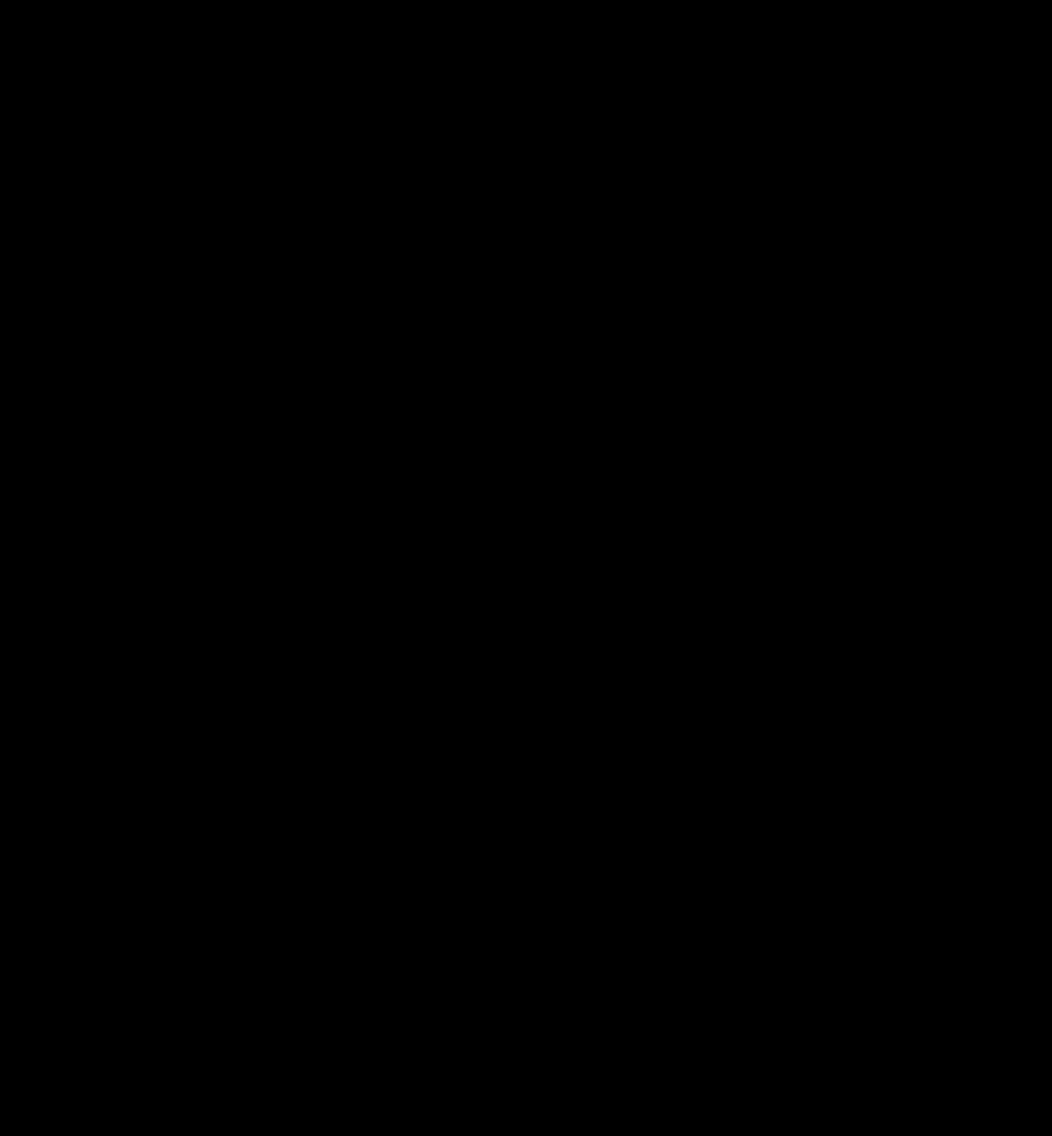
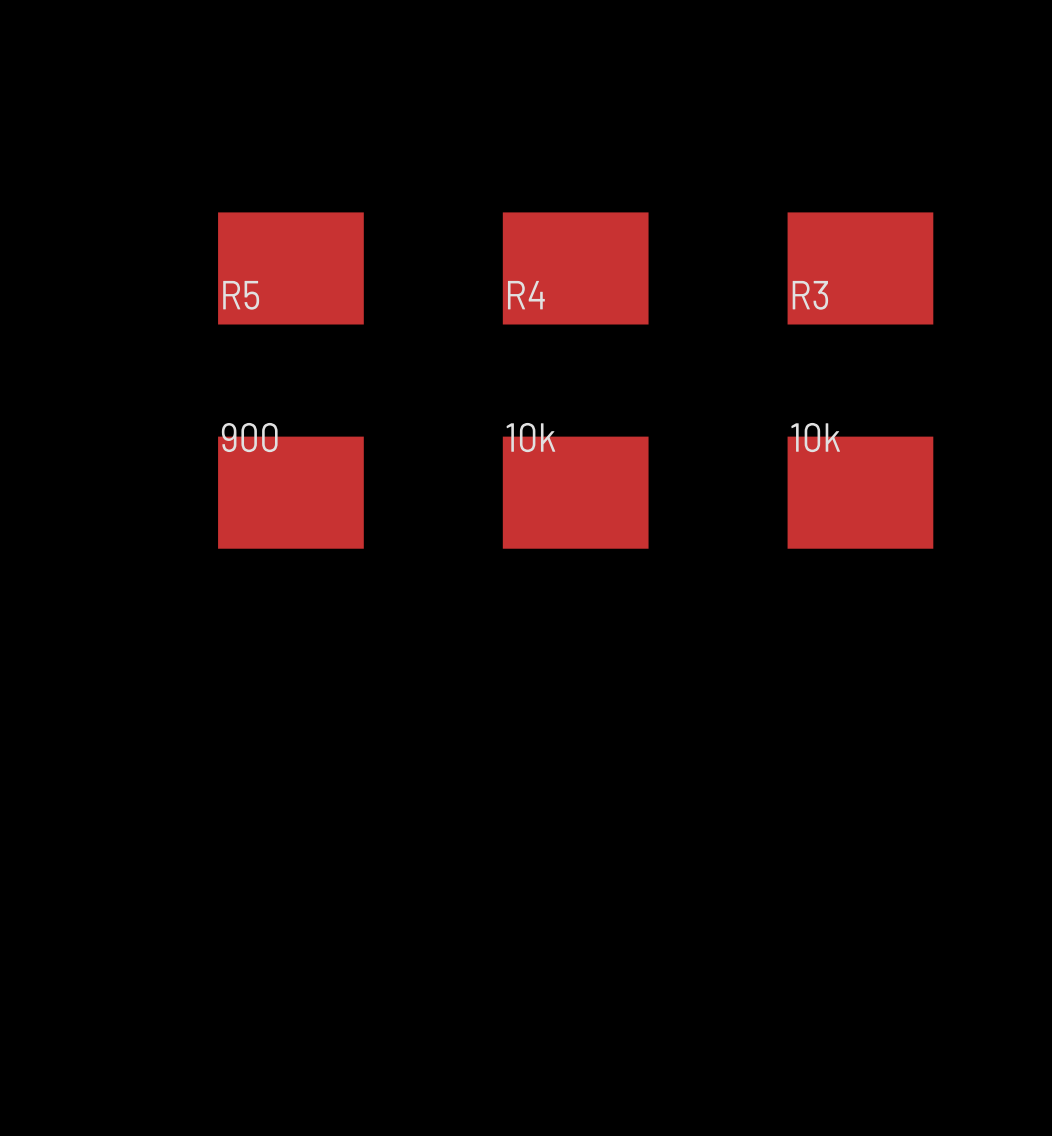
R5: none -> 900 (290, 380)
R4: none -> 10k (575, 380)
R3: none -> 10k (860, 380)

